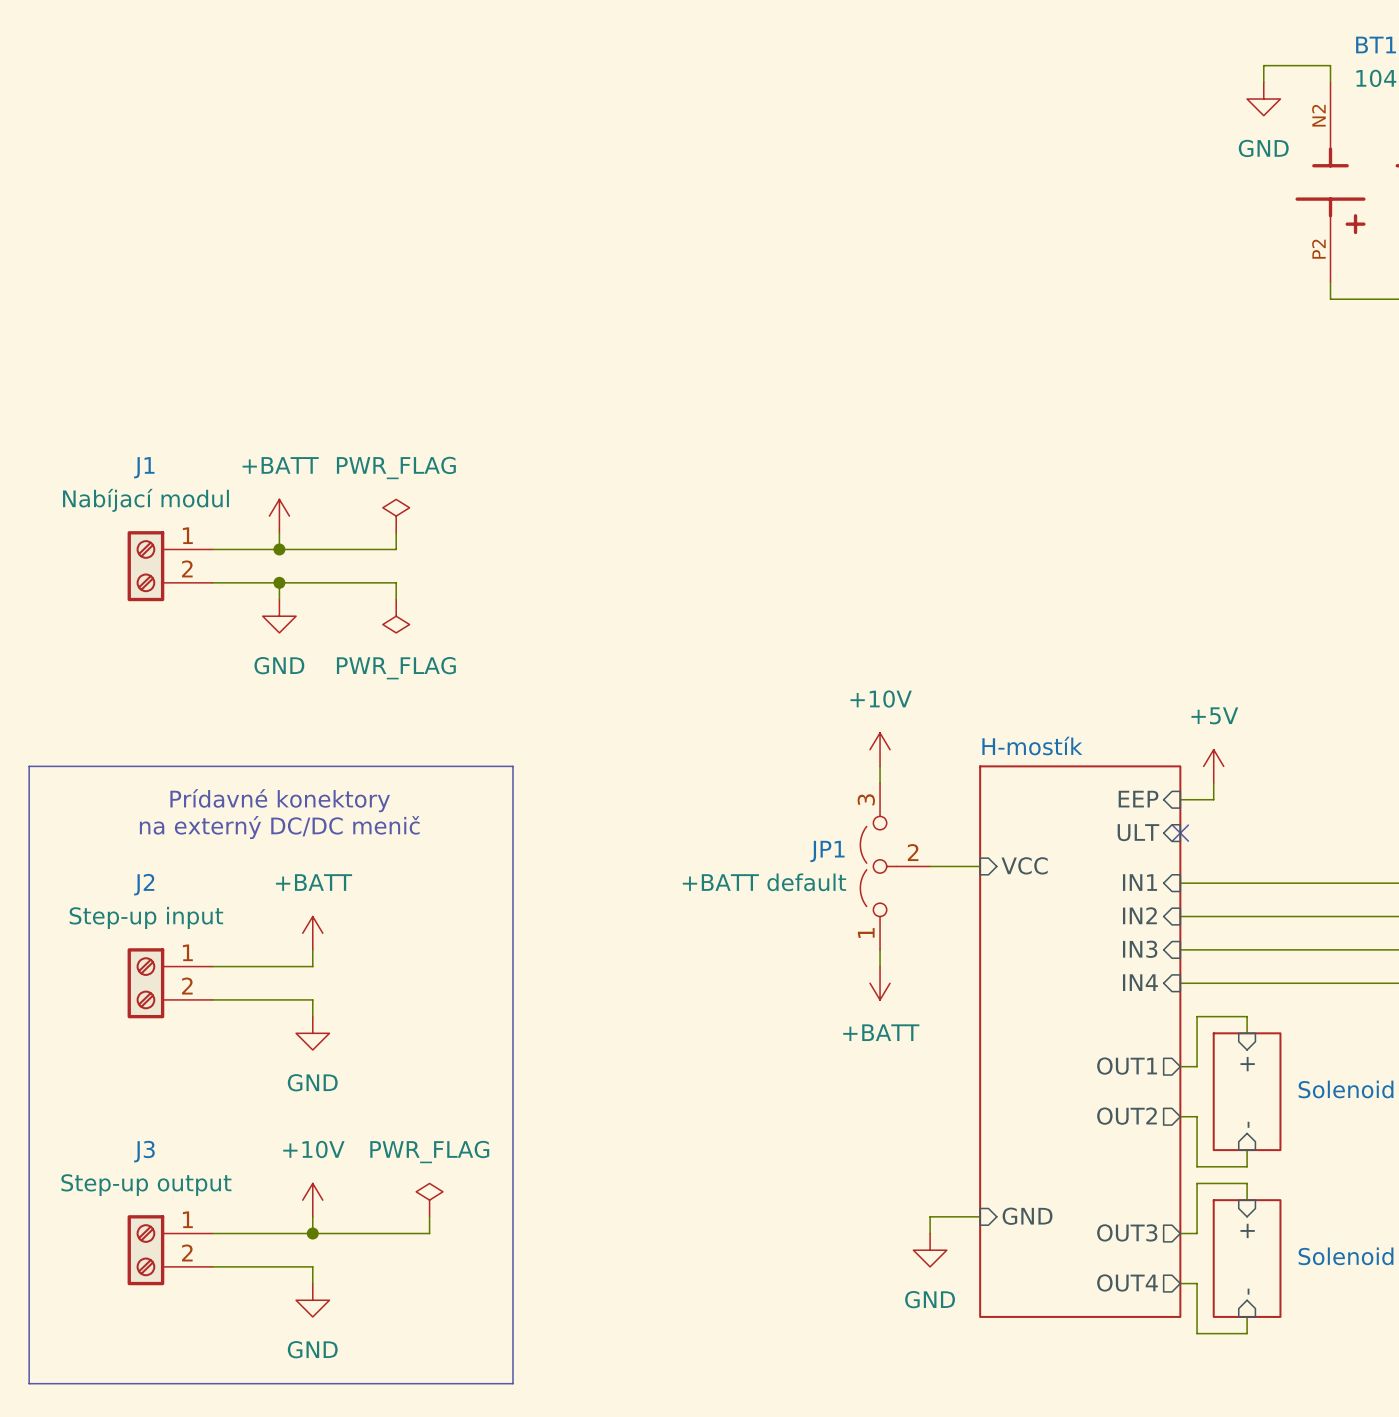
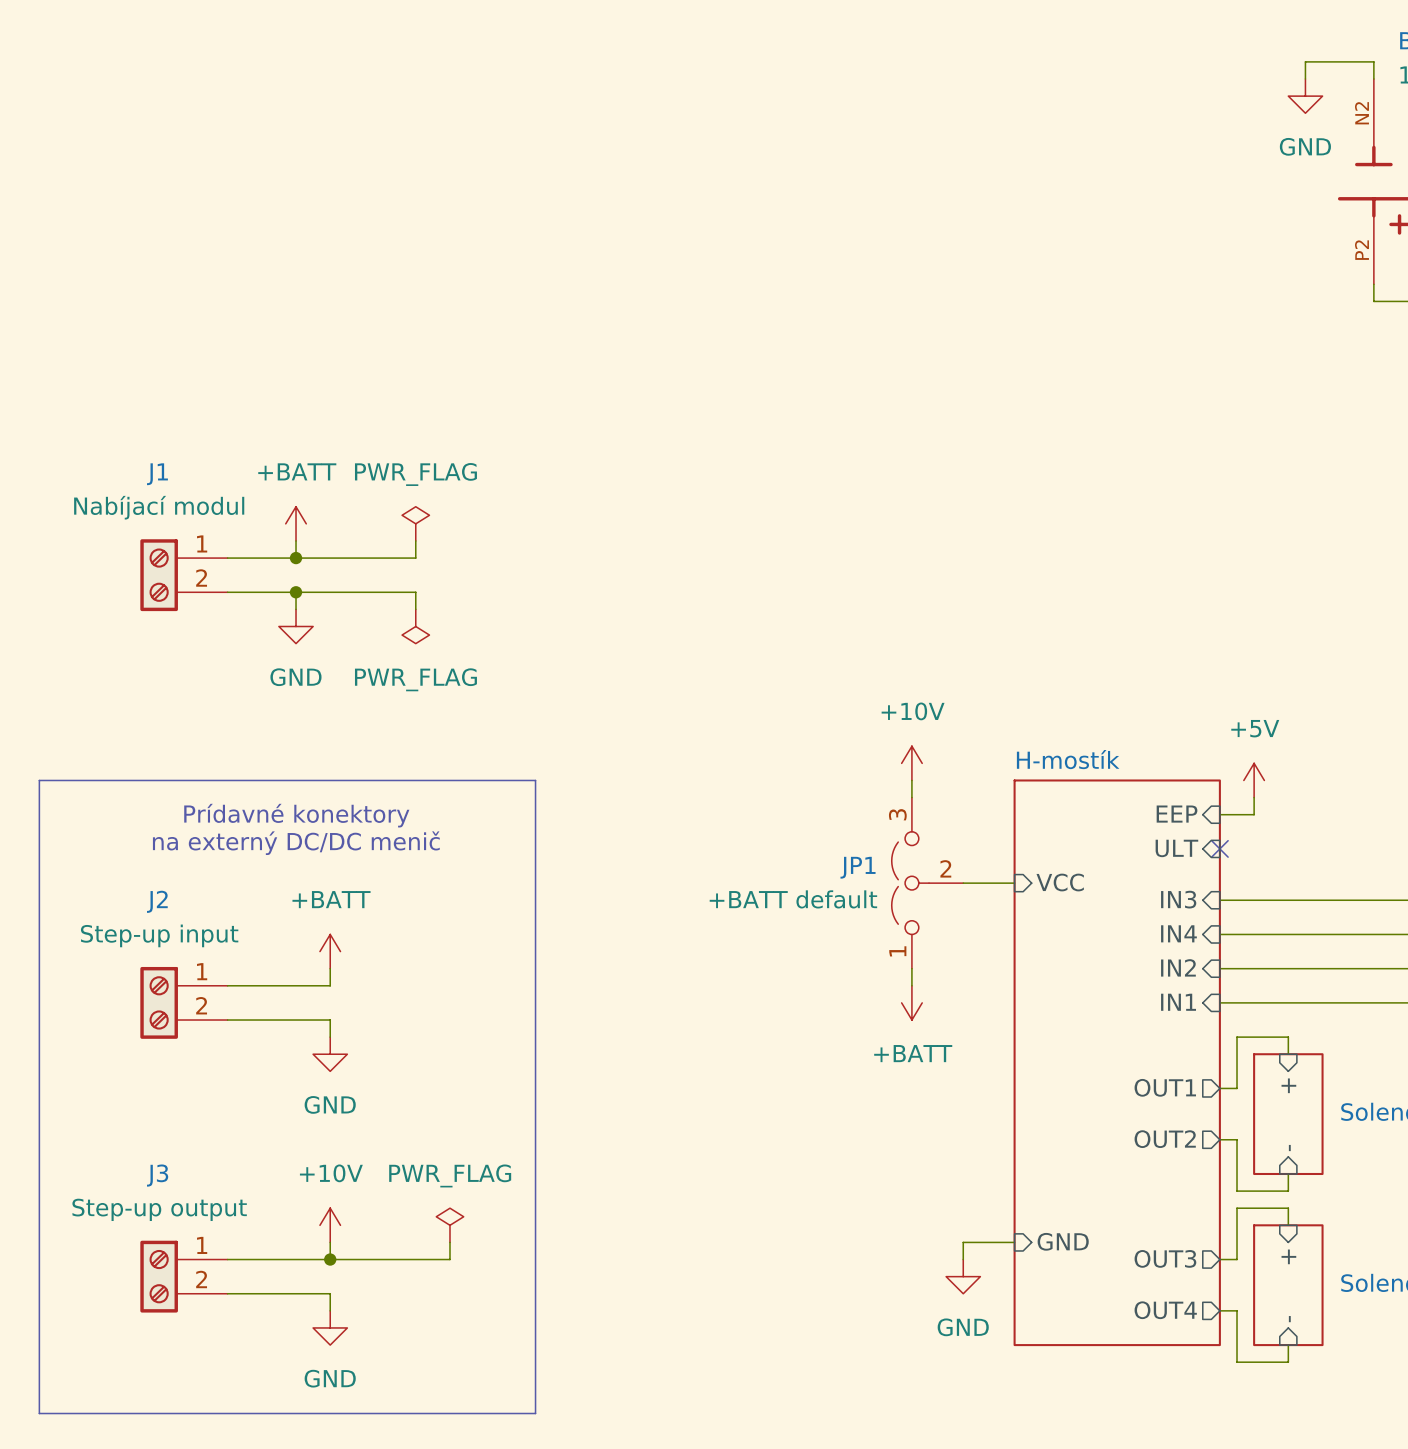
sheet pin: IN1 (1140, 882) -> IN3 (1178, 899)
sheet pin: IN2 (1139, 915) -> IN4 (1178, 933)
sheet pin: IN3 (1140, 949) -> IN2 (1178, 967)
sheet pin: IN4 (1140, 982) -> IN1 (1178, 1002)

